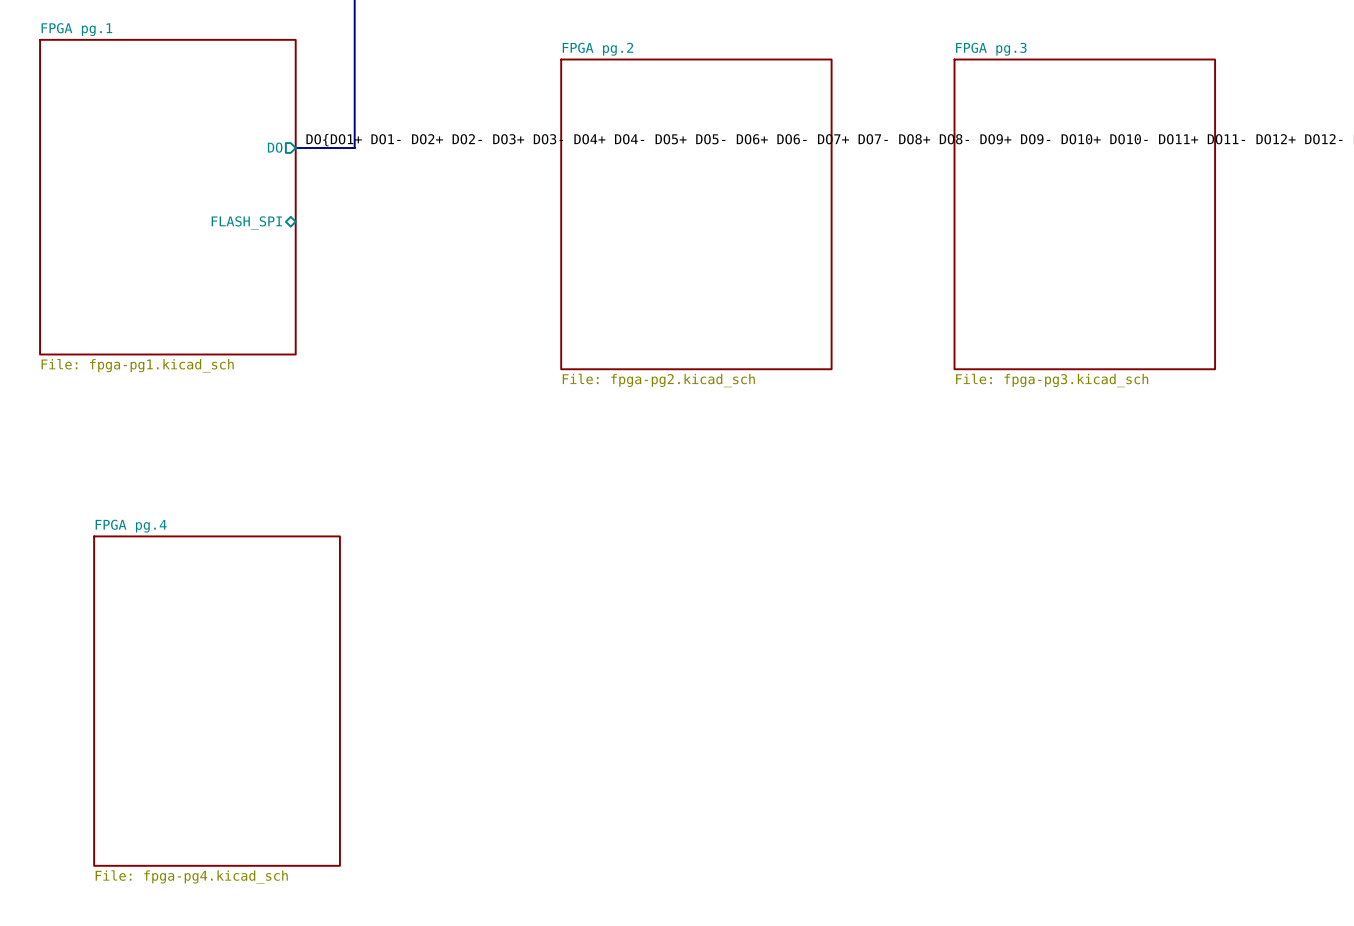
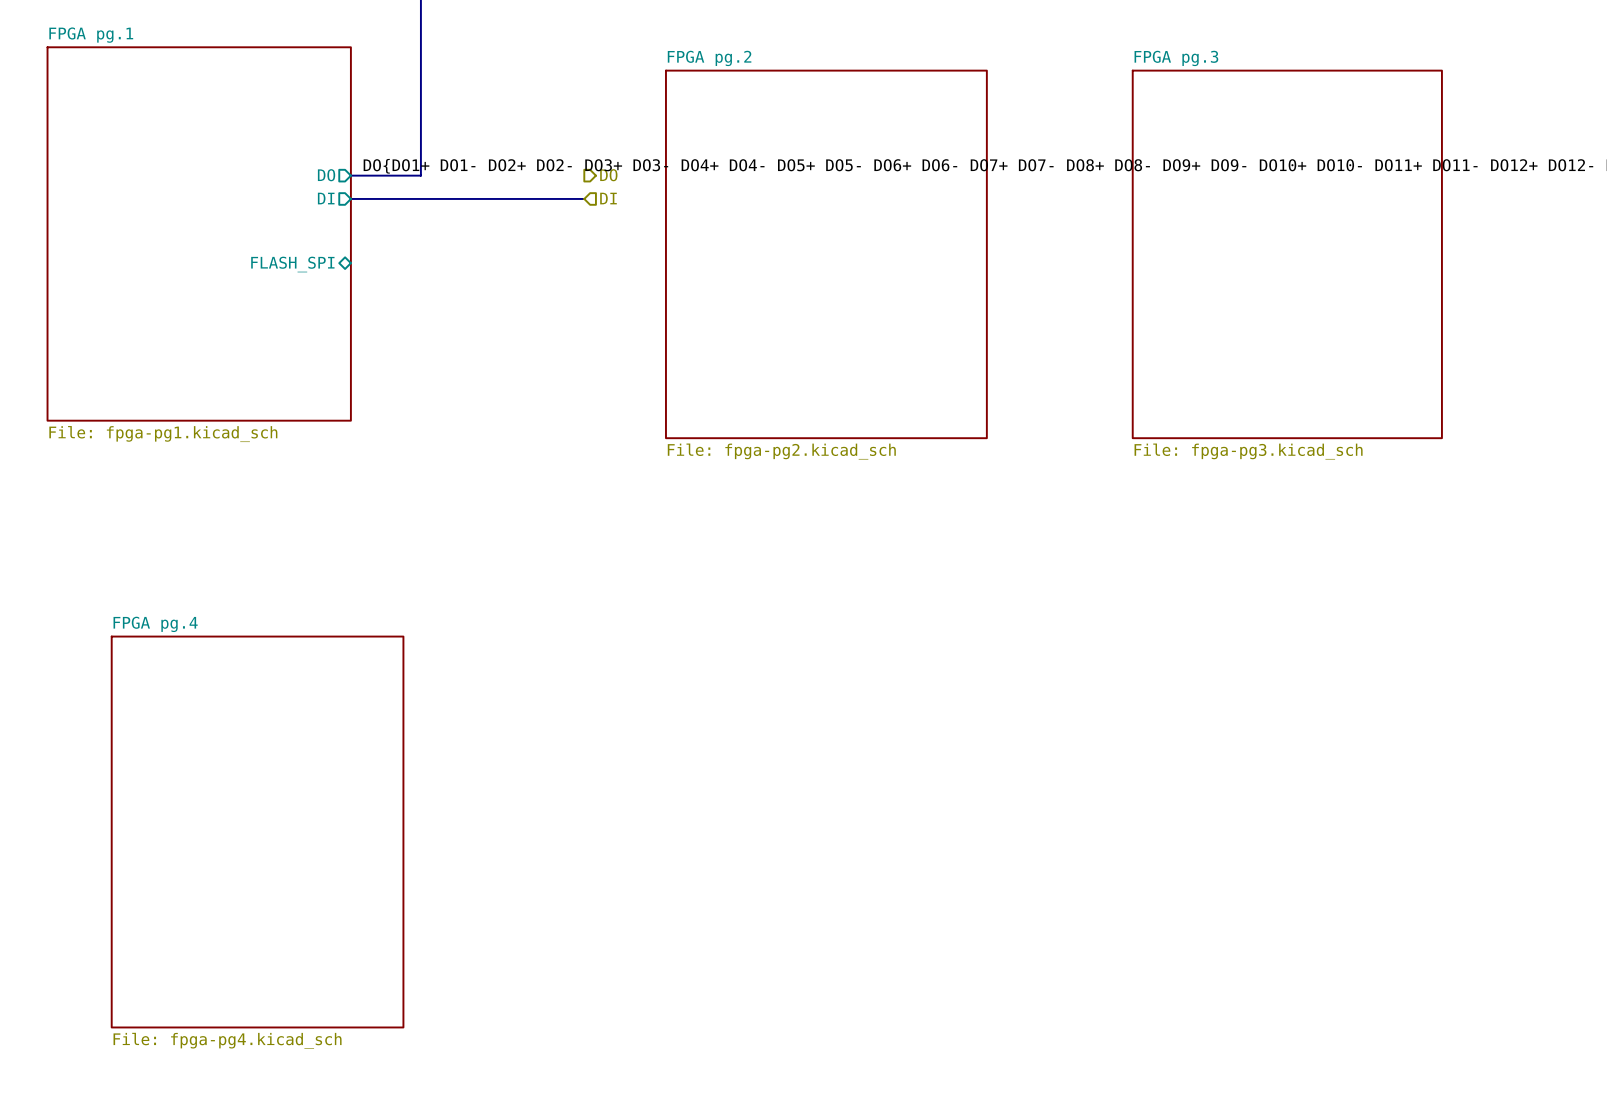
hierarchical label: none -> DO (608, 175)
sheet pin: none -> DI (326, 198)
bus: none -> (350, 198) (584, 198)
hierarchical label: none -> DI (608, 198)

